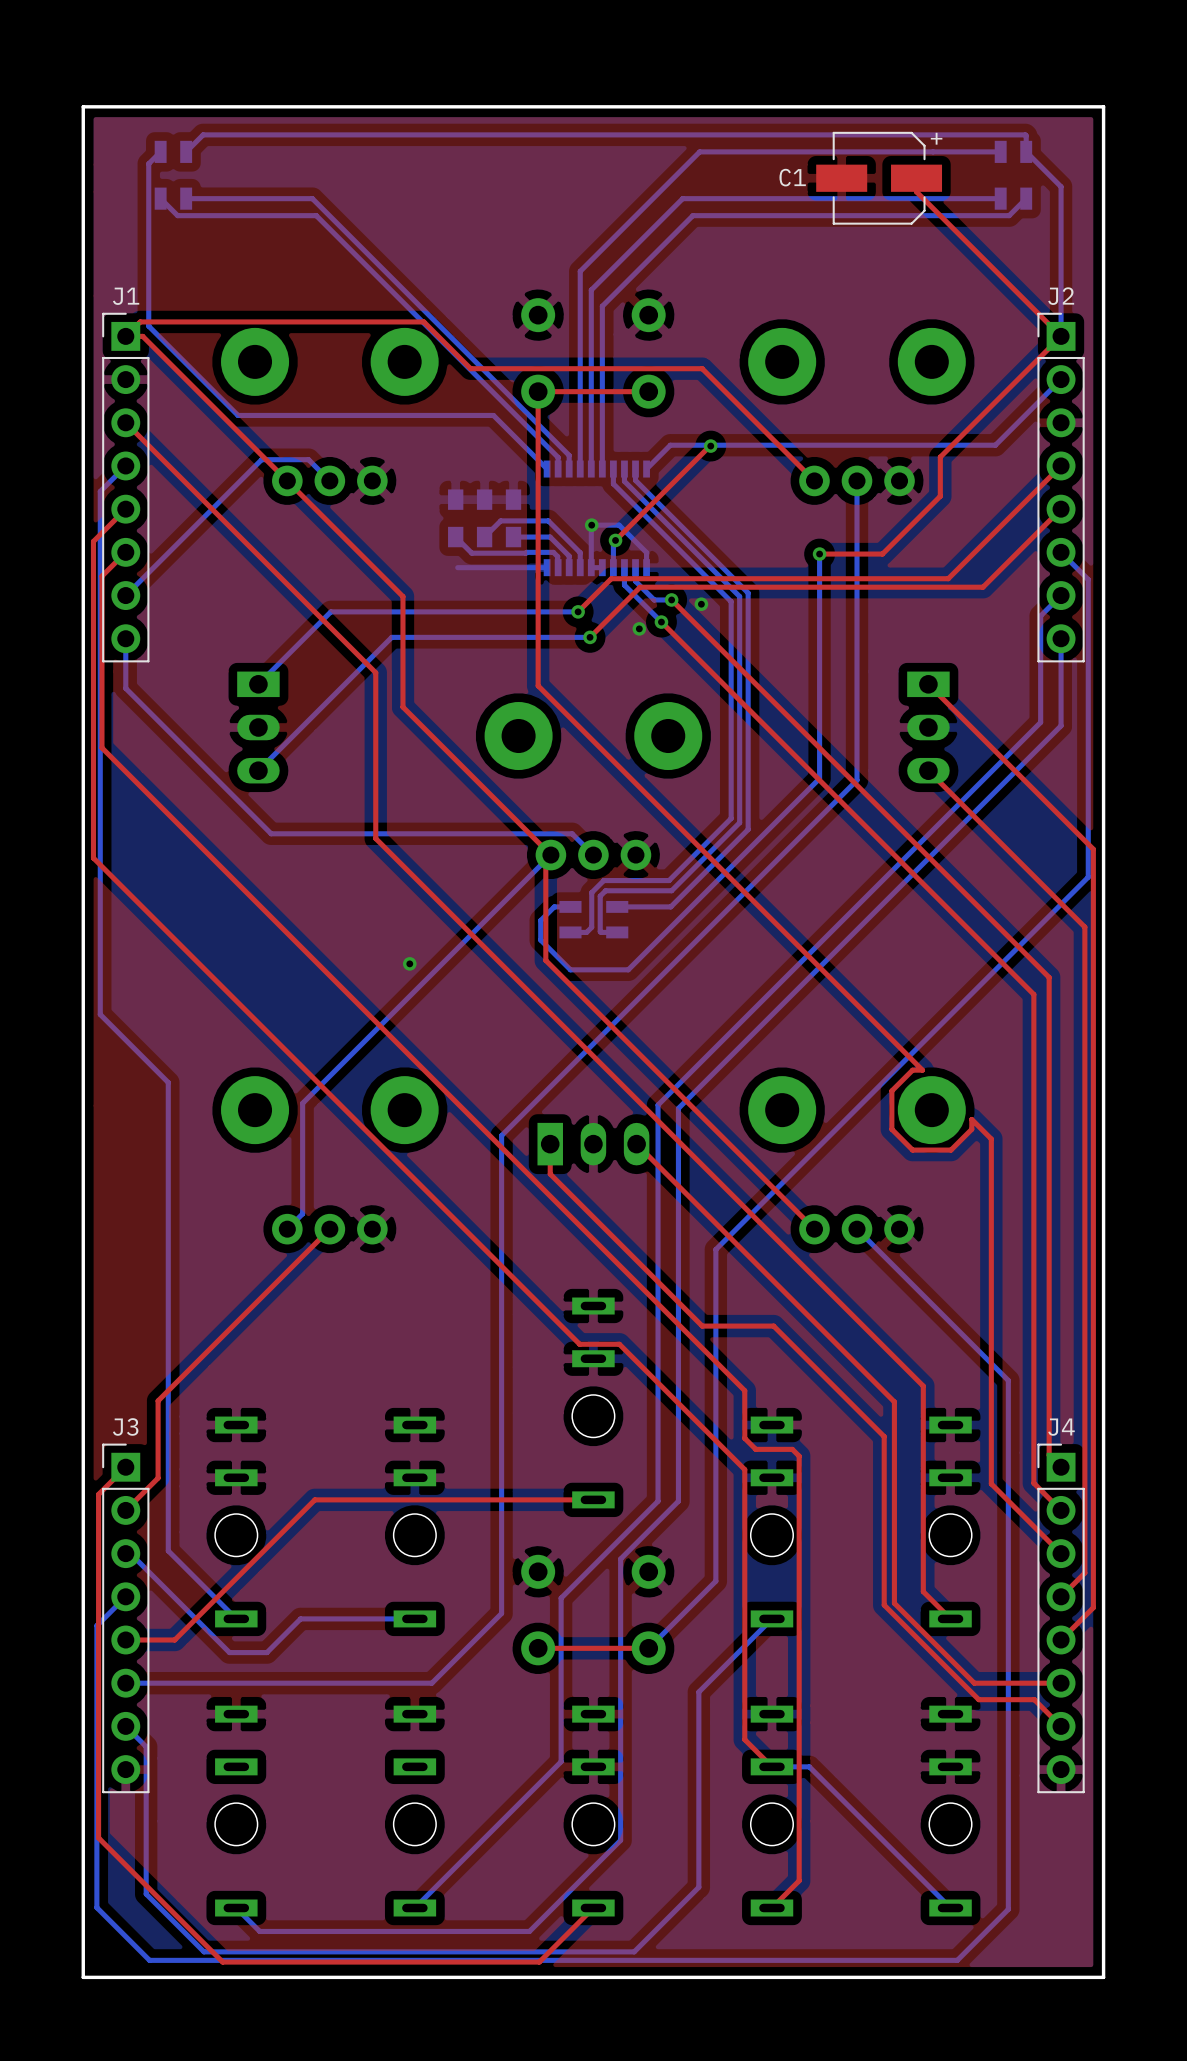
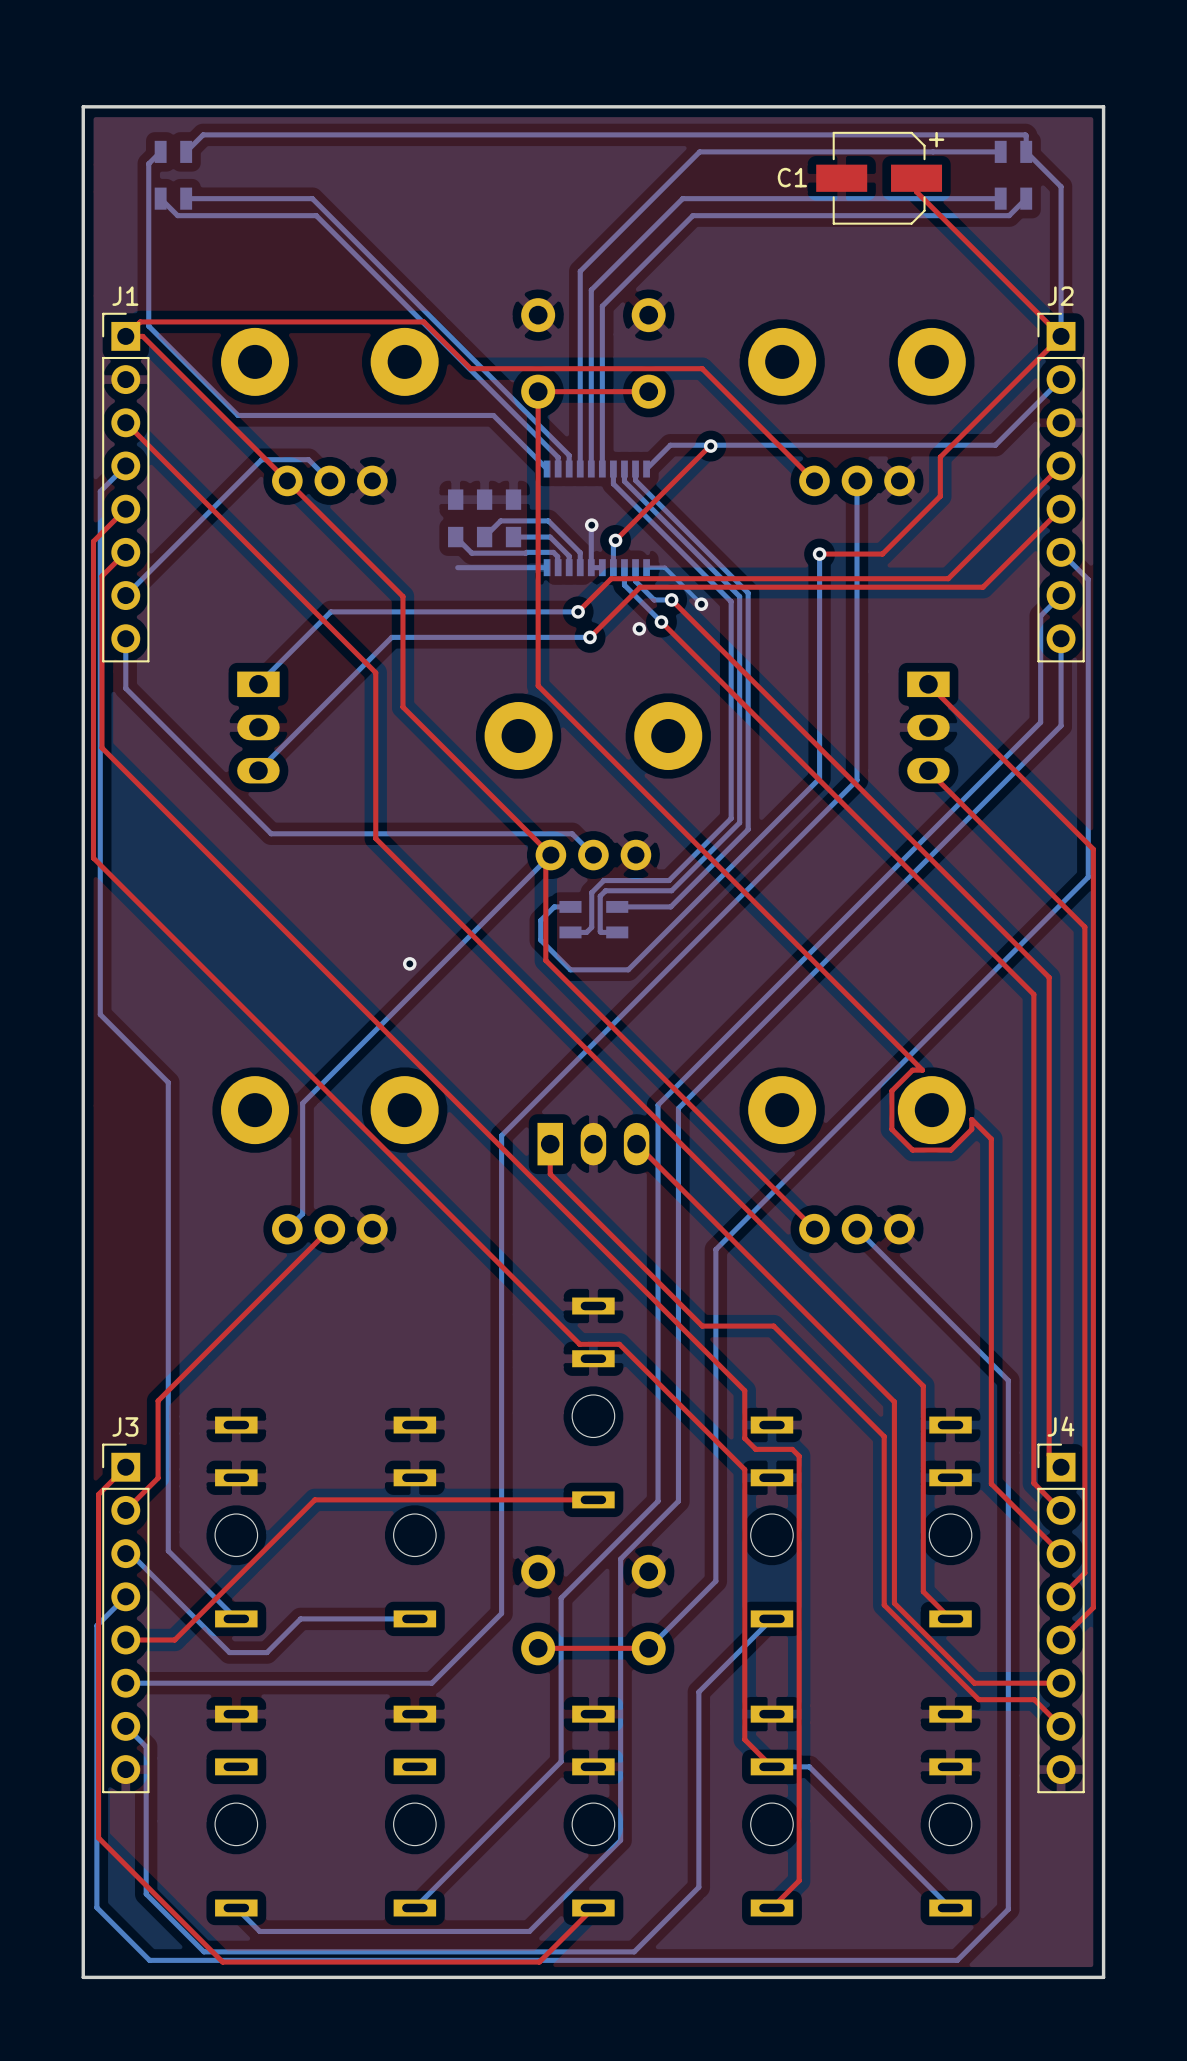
bottom track: (591, 525) (619, 525) (646, 552) (646, 567) -> (701, 604) (664, 567) (646, 567)

